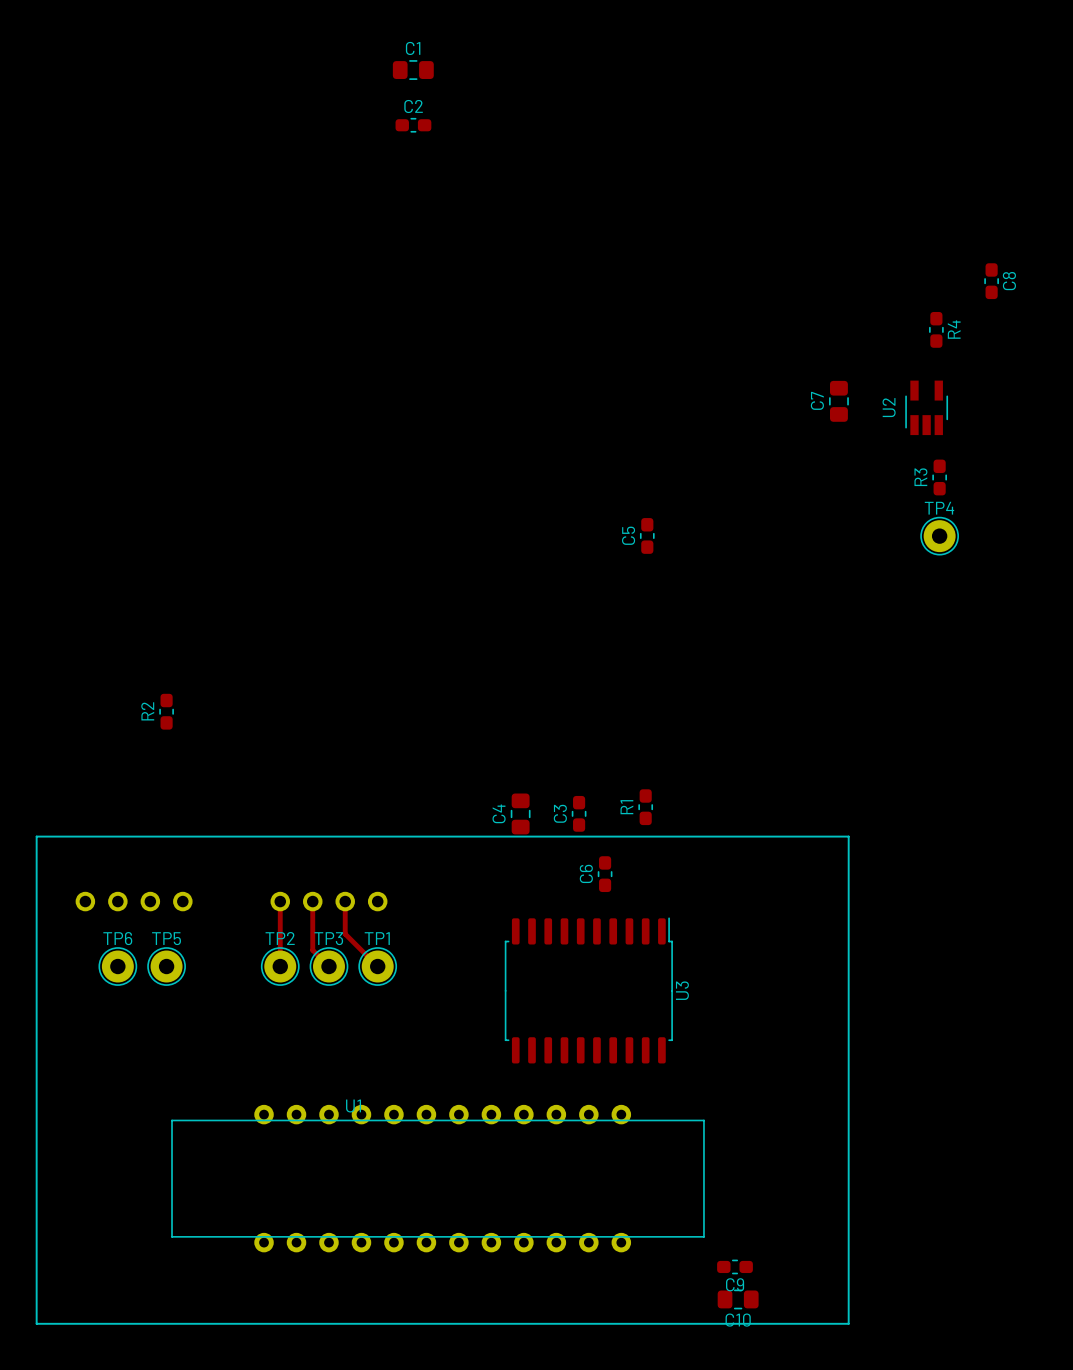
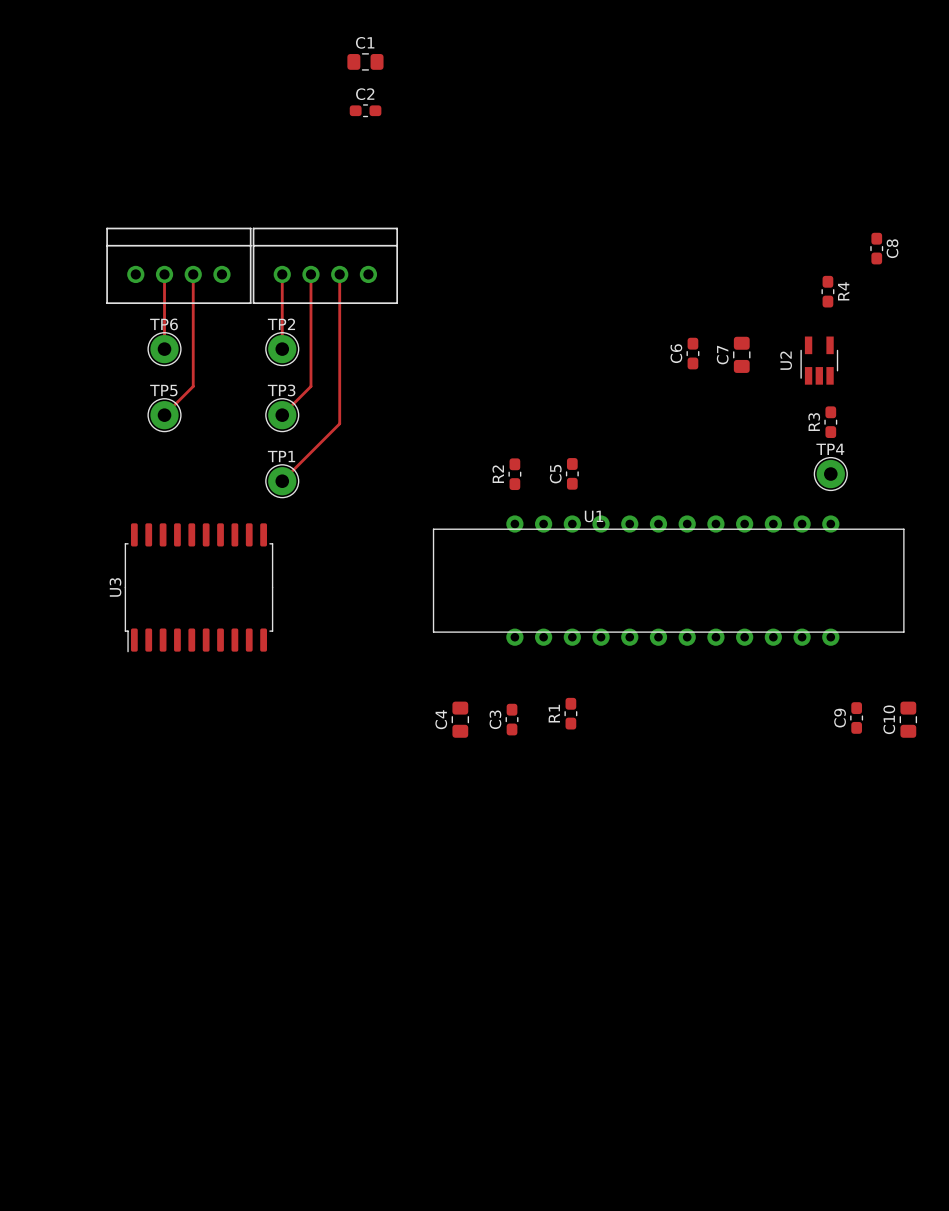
part: none -> (178, 265)
part: none -> (325, 265)
top track: none -> (164, 274) (164, 349)
top track: none -> (193, 274) (193, 386) (164, 415)
top track: none -> (282, 274) (282, 349)
top track: none -> (310, 274) (310, 386) (282, 415)
top track: none -> (339, 274) (339, 423) (282, 481)
R2 position: (166, 711) -> (514, 474)
line: (36, 836) (848, 836) (848, 1323) (36, 1323) (36, 836) -> none
C6 position: (605, 874) -> (692, 353)
part: (134, 901) -> none
top track: (280, 901) (280, 966) -> none
top track: (312, 901) (312, 950) (328, 966) -> none
part: (328, 901) -> none
top track: (345, 901) (345, 934) (377, 966) -> none
TP6 position: (117, 966) -> (164, 349)
TP5 position: (166, 966) -> (164, 415)
TP2 position: (280, 966) -> (282, 349)
TP3 position: (328, 966) -> (282, 415)
TP1 position: (377, 966) -> (282, 481)
U3 rotation: 0° (588, 990) -> 180° (198, 587)
U3 position: (588, 990) -> (198, 587)
U1 position: (437, 1178) -> (668, 580)
C9 rotation: 0° (735, 1266) -> 90° clockwise (856, 717)
C9 position: (735, 1266) -> (856, 717)
C10 rotation: 0° (738, 1299) -> 90° clockwise (908, 719)
C10 position: (738, 1299) -> (908, 719)

